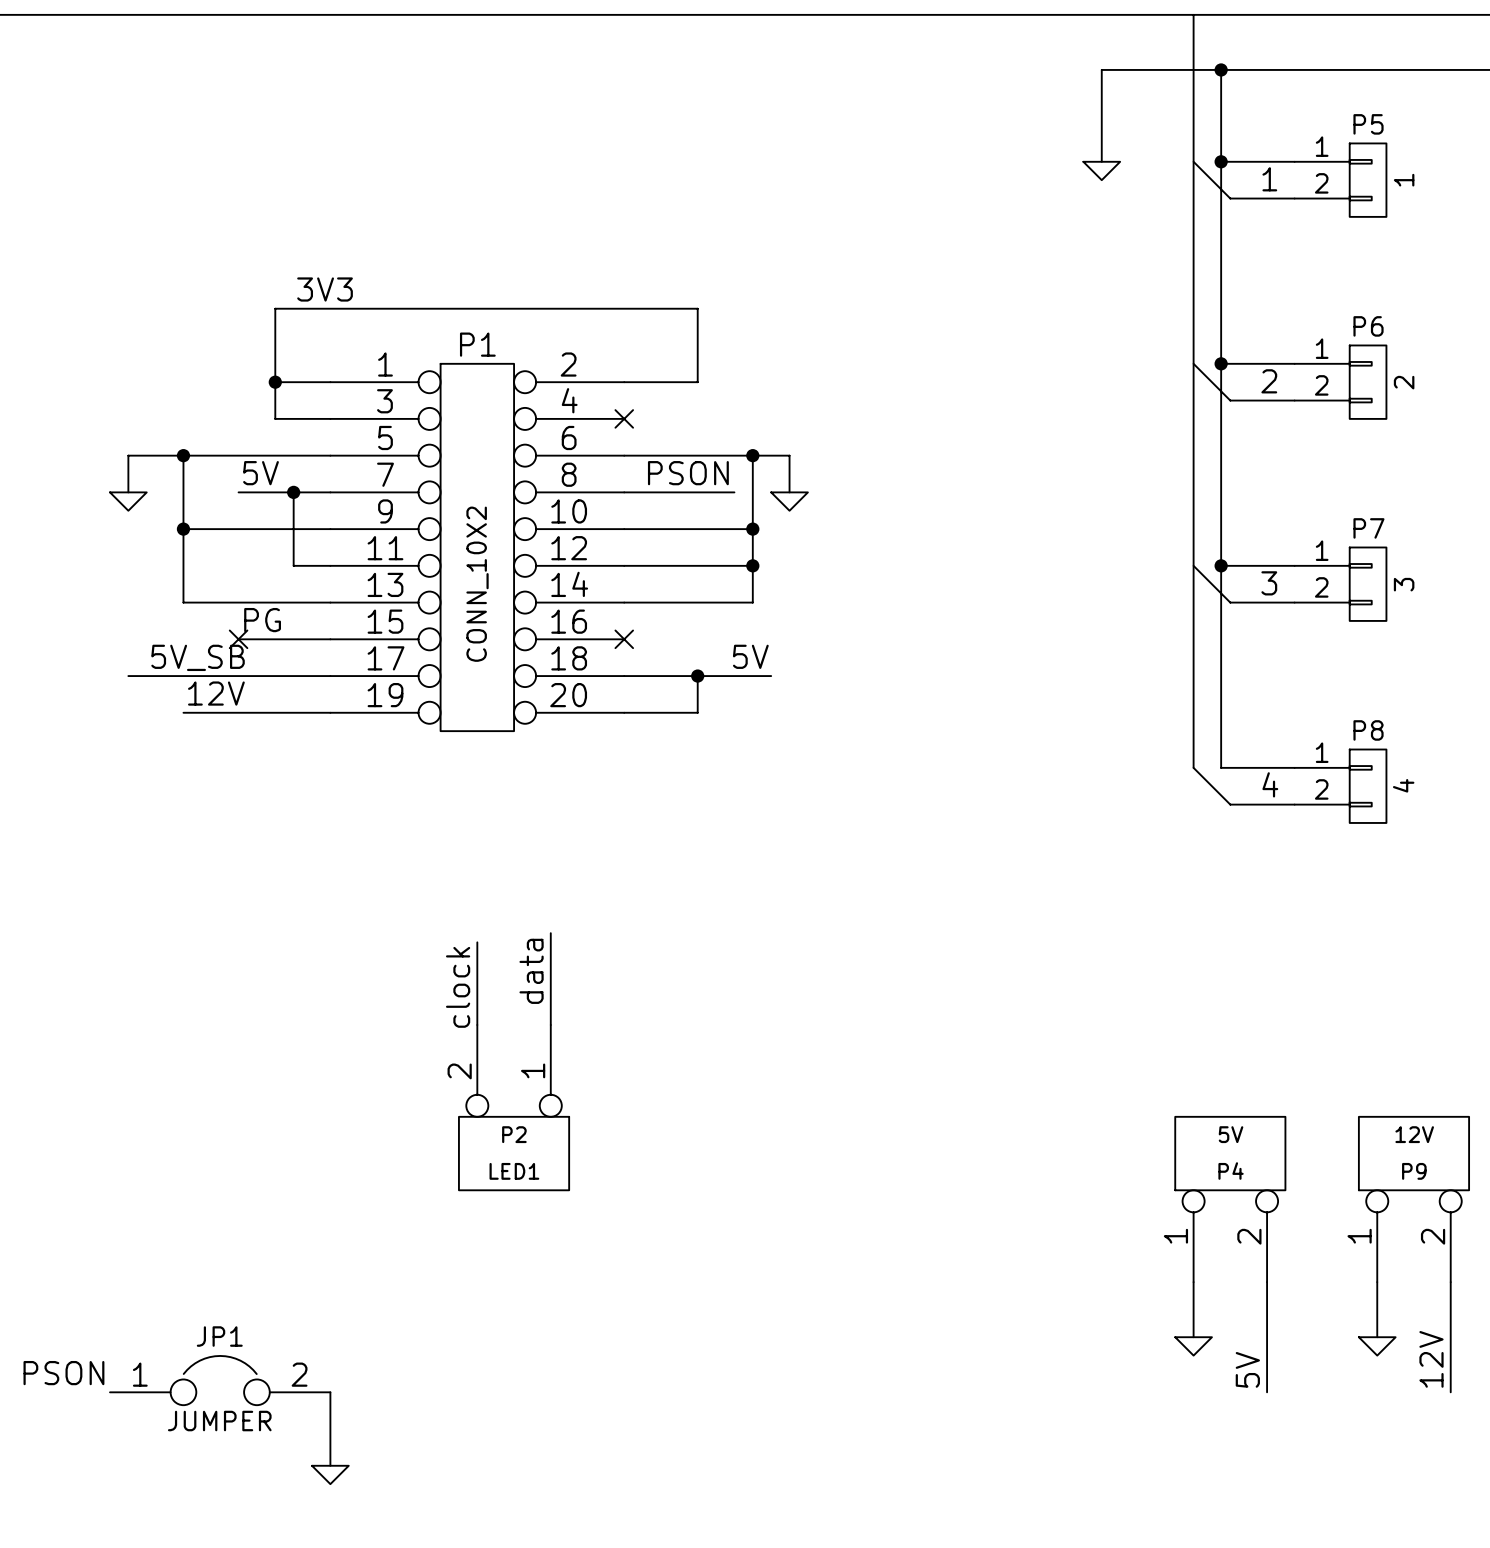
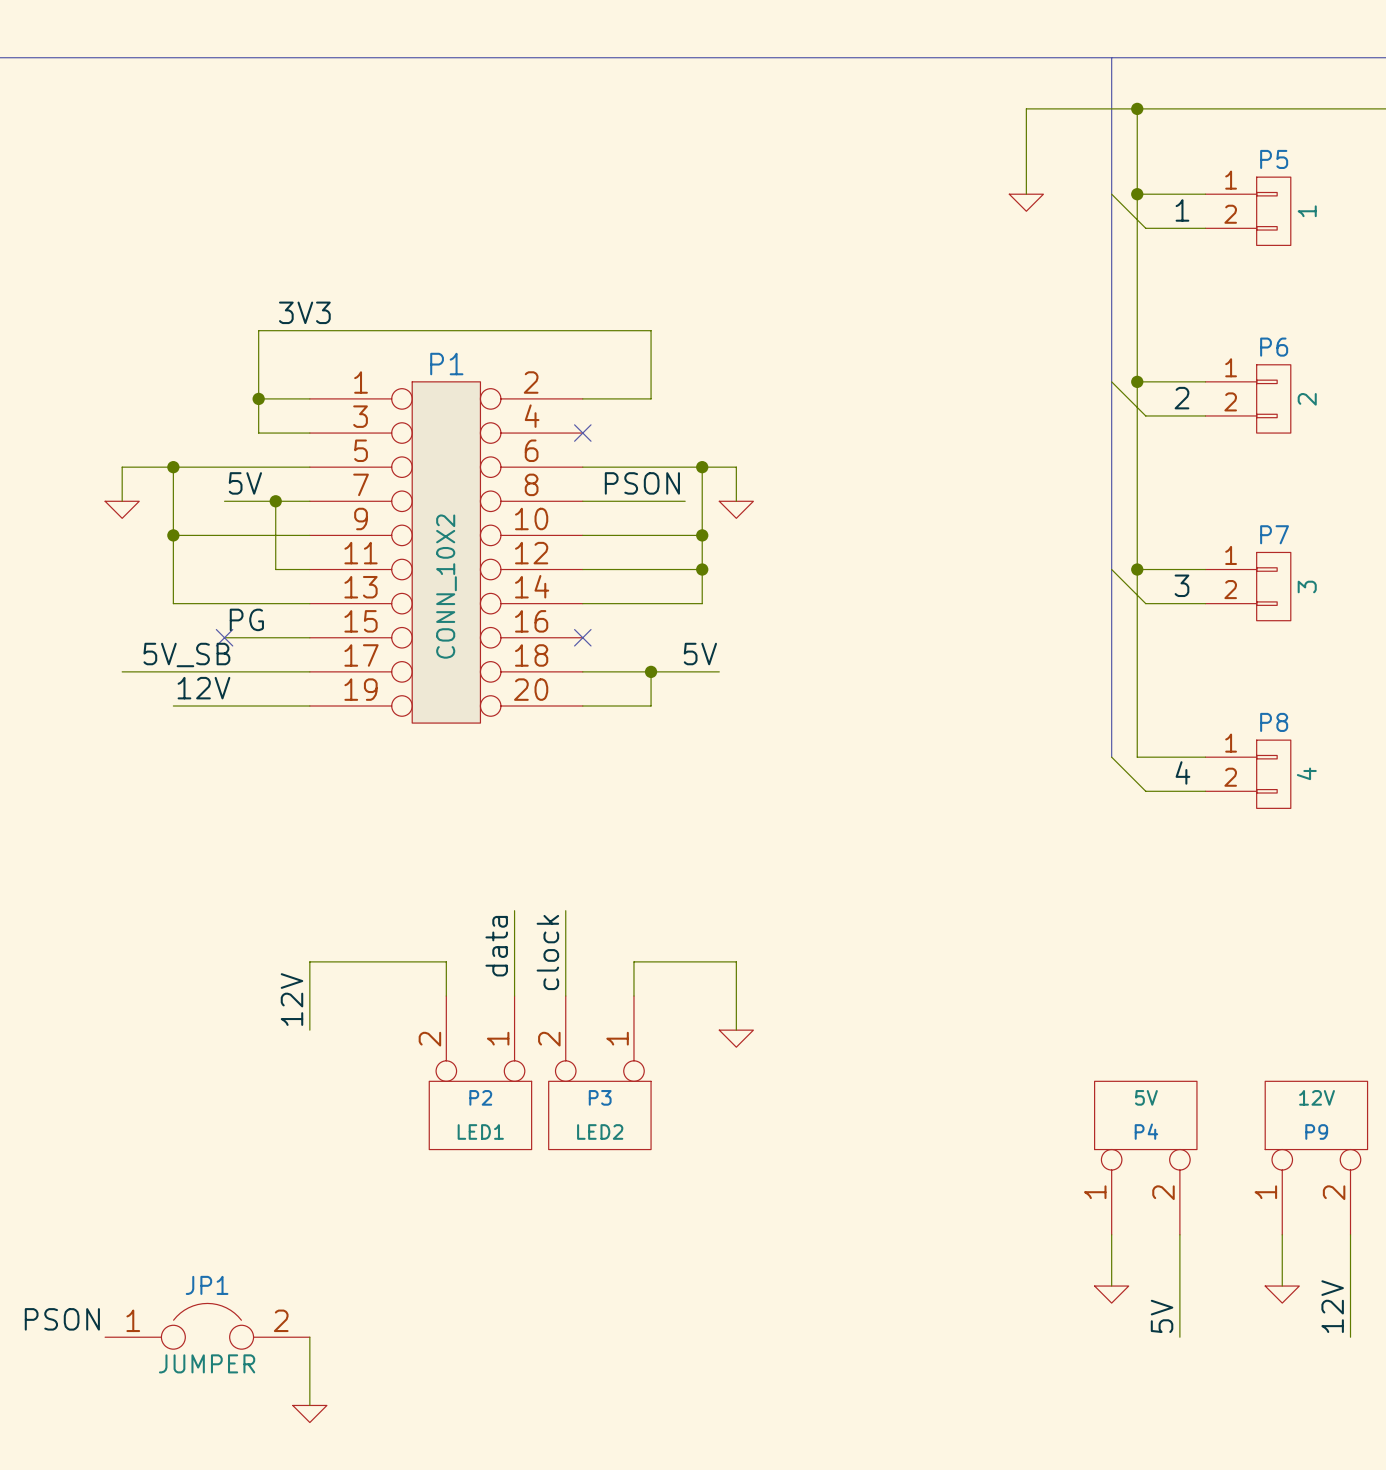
wire: none -> (565, 910) (565, 996)
wire: (477, 942) (477, 988) -> (309, 1030) (309, 961) (446, 961)
label position: clock (458, 987) -> clock (547, 952)
wire: none -> (633, 996) (633, 961) (736, 961) (736, 1030)
label: none -> 12V (291, 999)
power symbol: none -> (736, 1038)
P3: none -> LED2 (599, 1072)

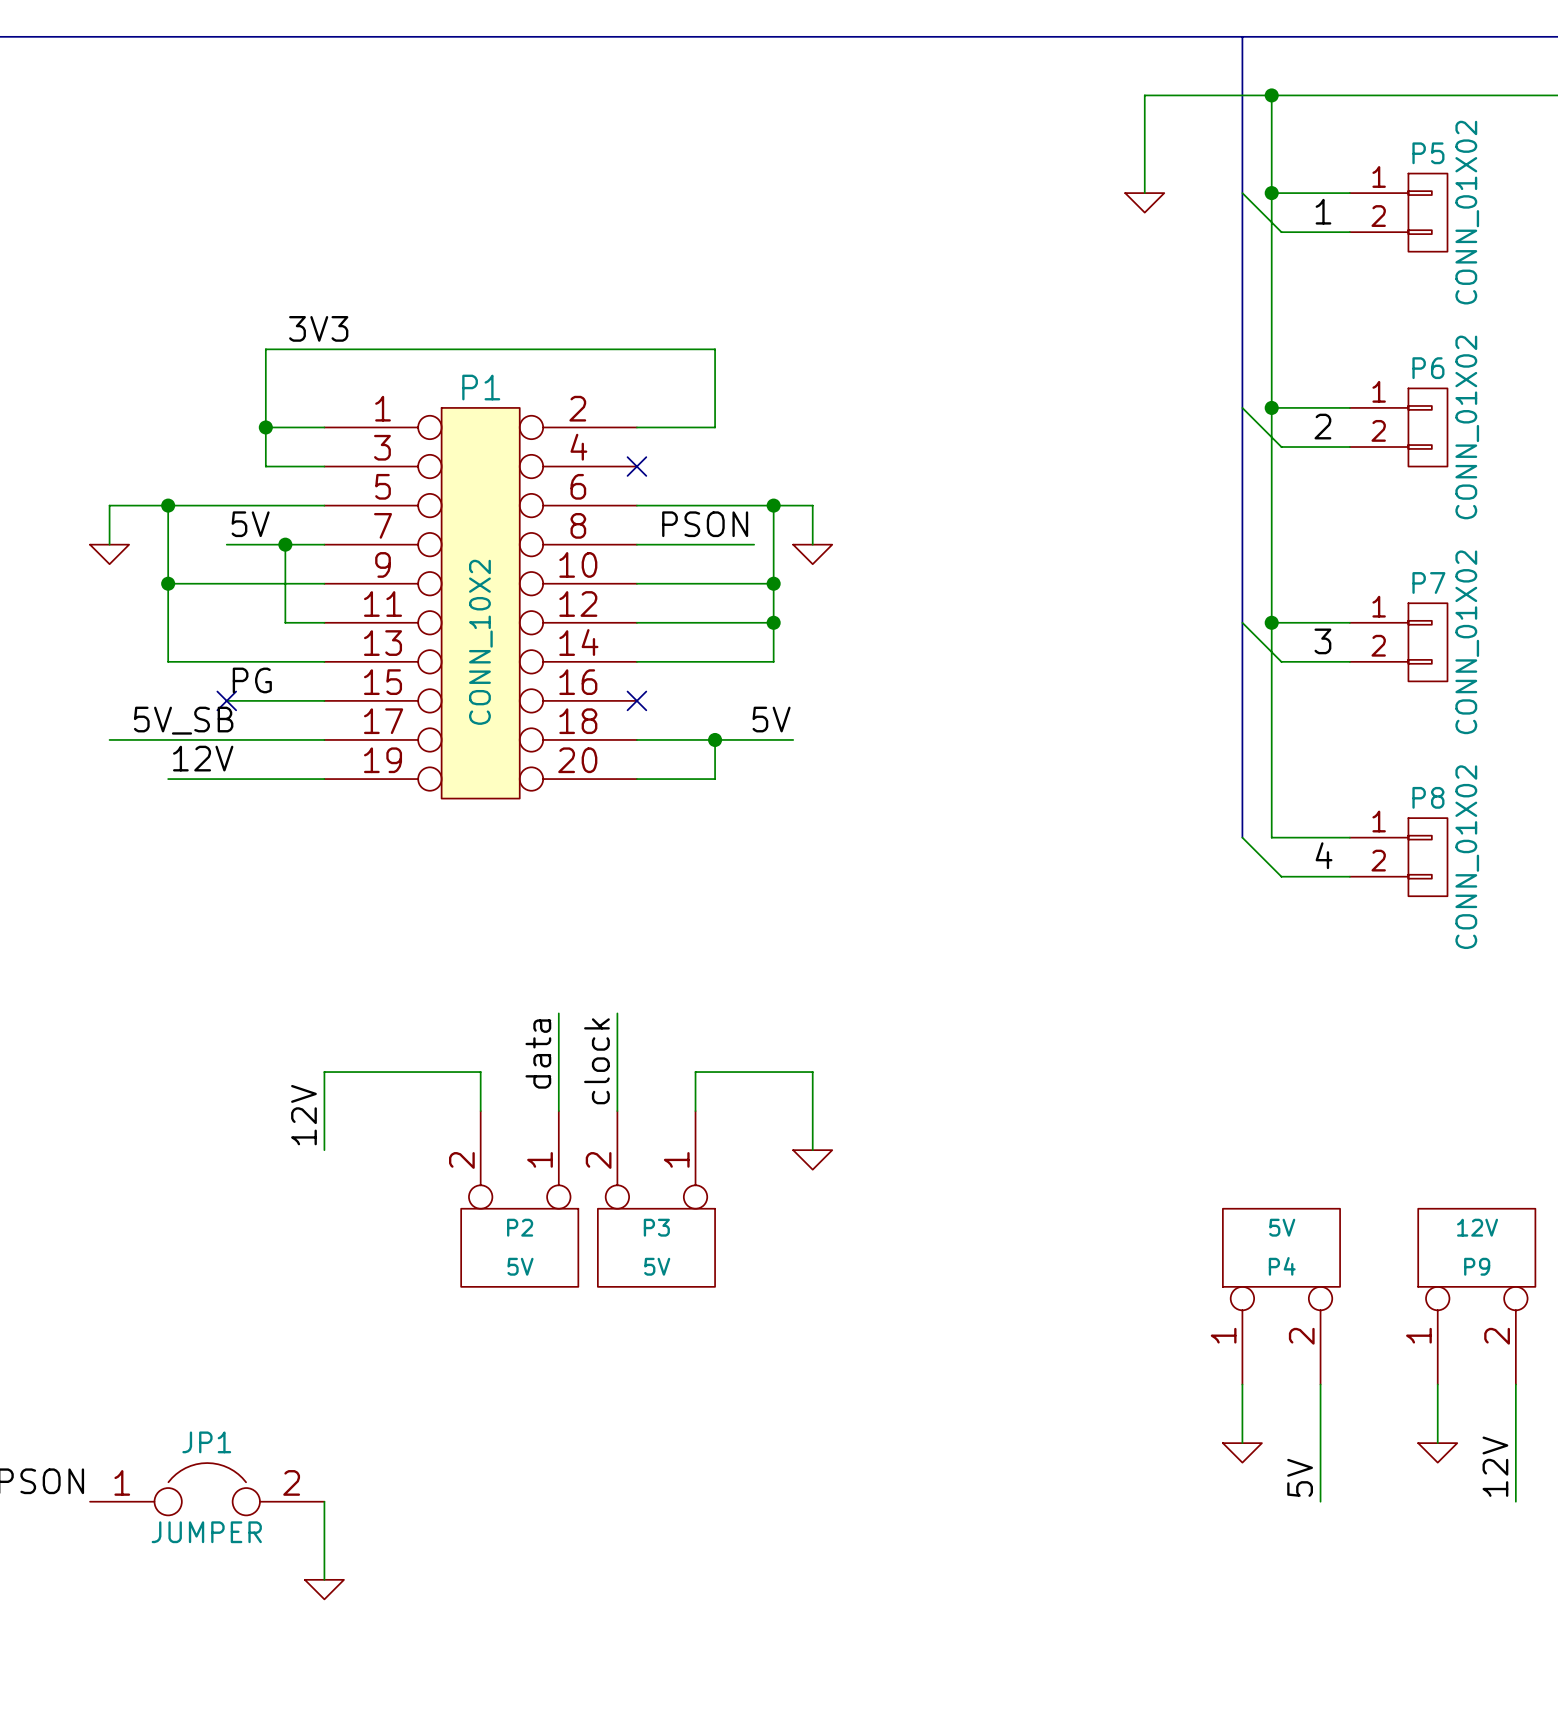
P5 value: 1 (1307, 211) -> CONN_01X02 (1467, 212)
P6 value: 2 (1307, 399) -> CONN_01X02 (1467, 427)
P7 value: 3 (1307, 586) -> CONN_01X02 (1467, 642)
P8 value: 4 (1306, 773) -> CONN_01X02 (1467, 857)
P2 value: LED1 (480, 1131) -> 5V (520, 1266)
P3 value: LED2 (600, 1131) -> 5V (657, 1266)

